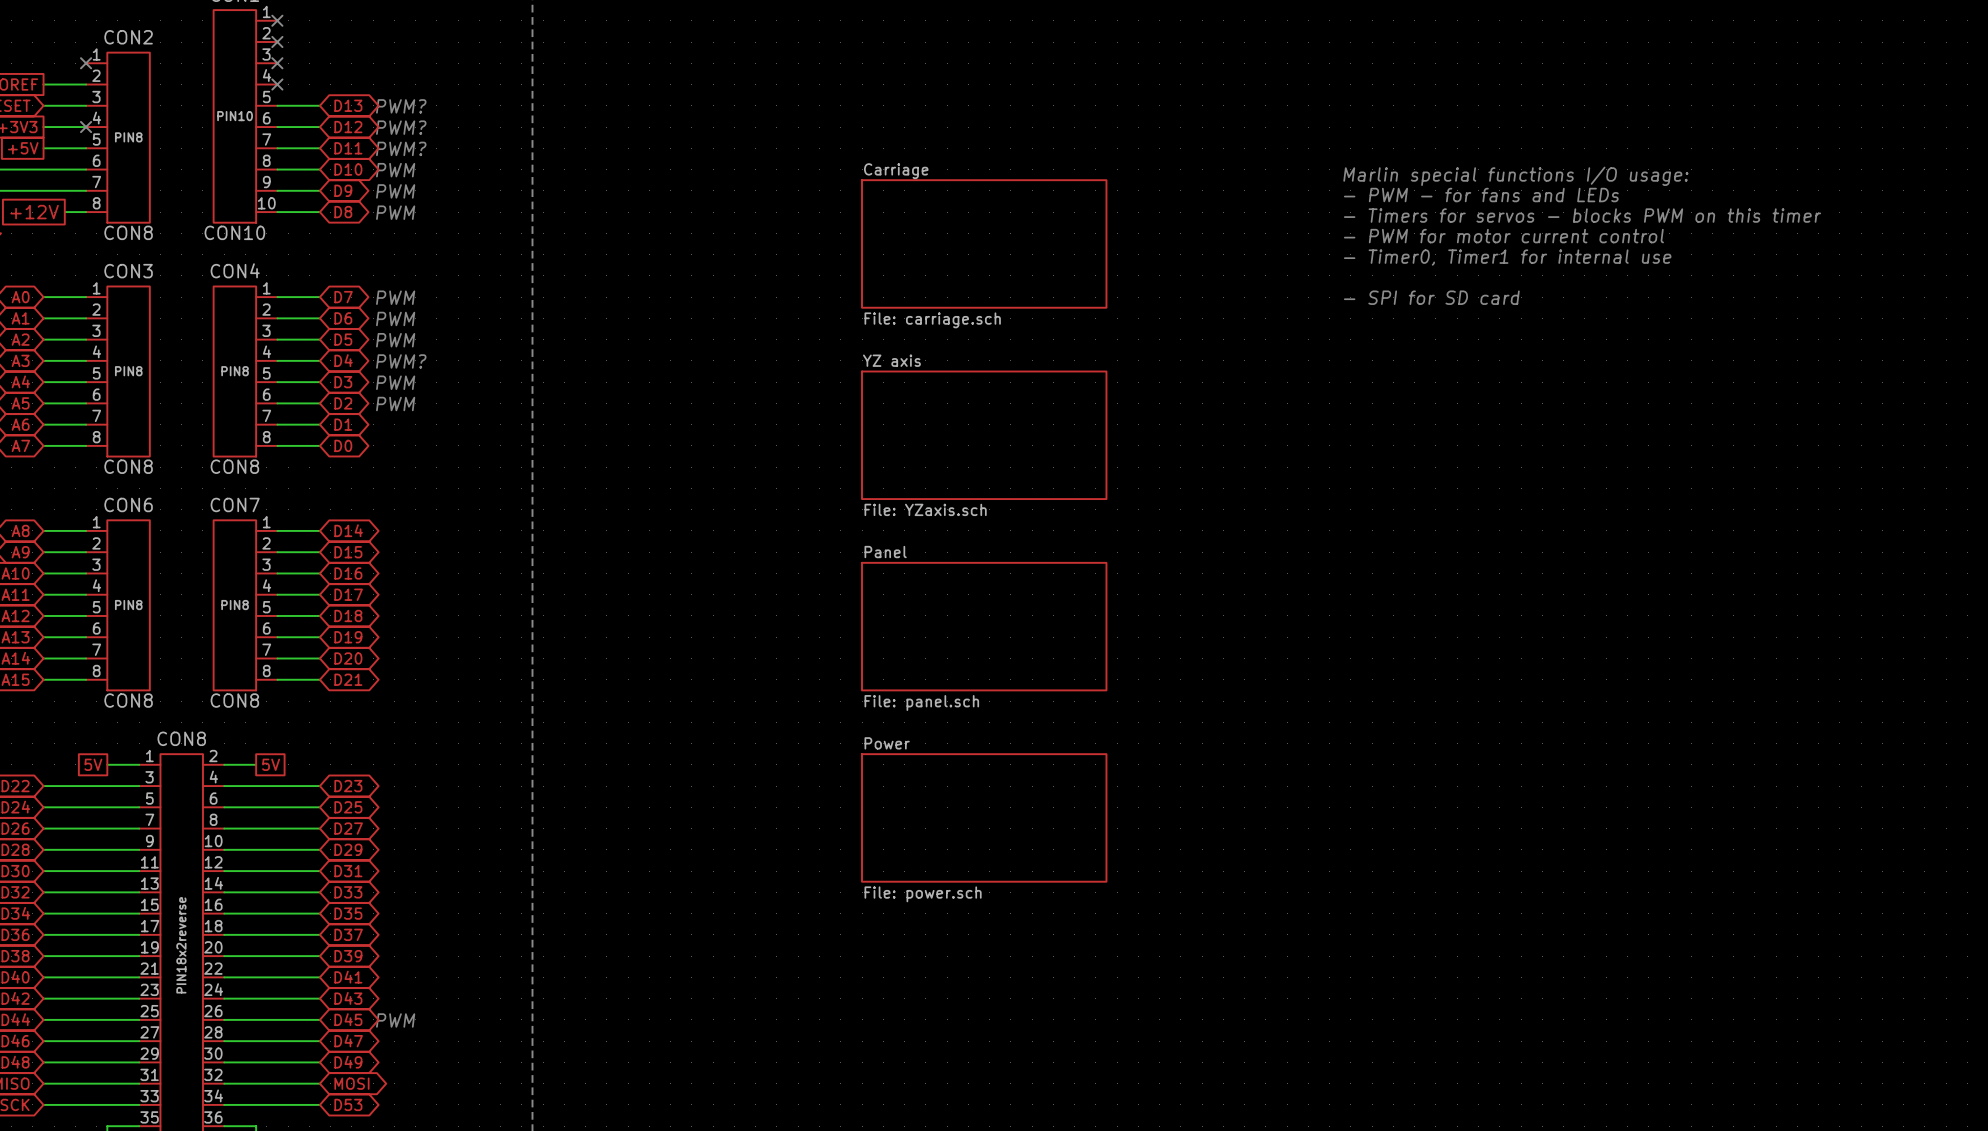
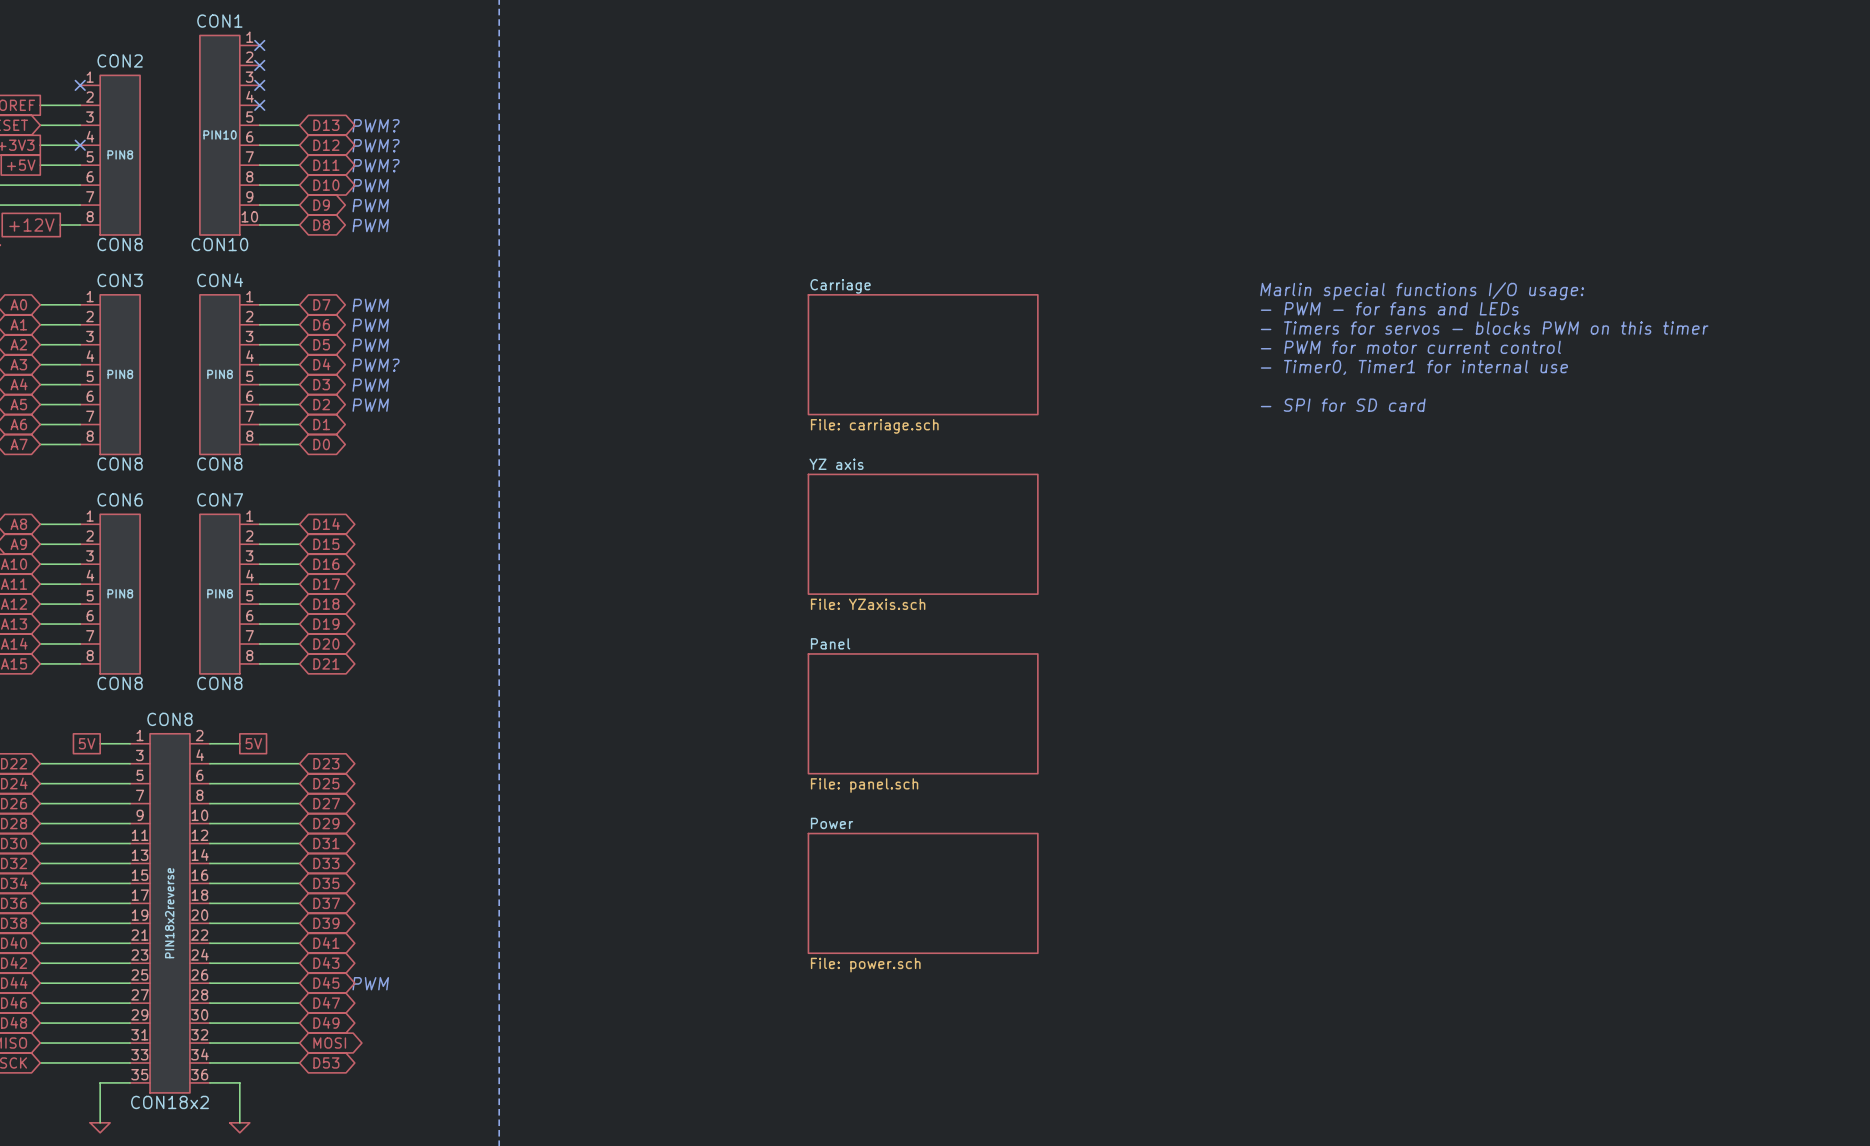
text position: Marlin special functions I/O usage: (1515, 176) -> Marlin special functions I/O usage: (1422, 291)
text: - PWM - for fans and LEDs (1481, 195) -> none
text position: - Timers for servos - blocks PWM on this timer (1582, 215) -> - Timers for servos - blocks PWM on this timer (1484, 328)
text position: - PWM for motor current control (1503, 236) -> - PWM for motor current control (1410, 347)
sheet Carriage position: (984, 243) -> (923, 354)
text position: - Timer0, Timer1 for internal use (1507, 257) -> - Timer0, Timer1 for internal use (1414, 367)
text: - SPI for SD card (1431, 297) -> - PWM - for fans and LEDs (1389, 308)
text: none -> - SPI for SD card (1343, 405)
sheet YZ axis position: (984, 435) -> (923, 534)
sheet Panel position: (984, 626) -> (923, 713)
sheet Power position: (984, 817) -> (923, 893)

